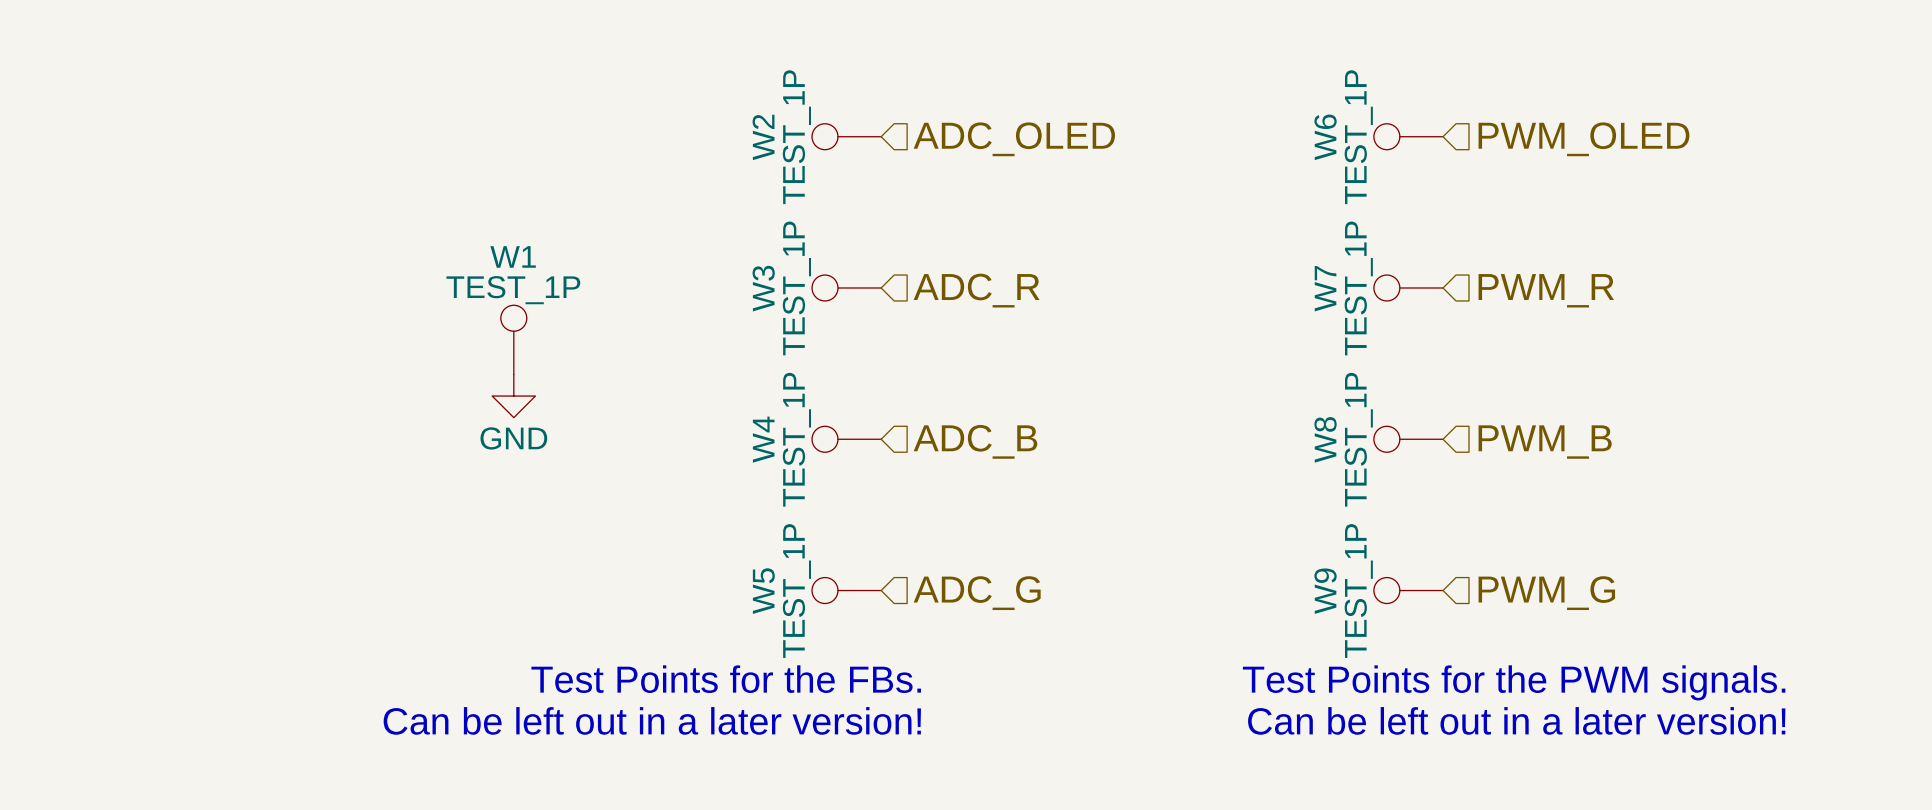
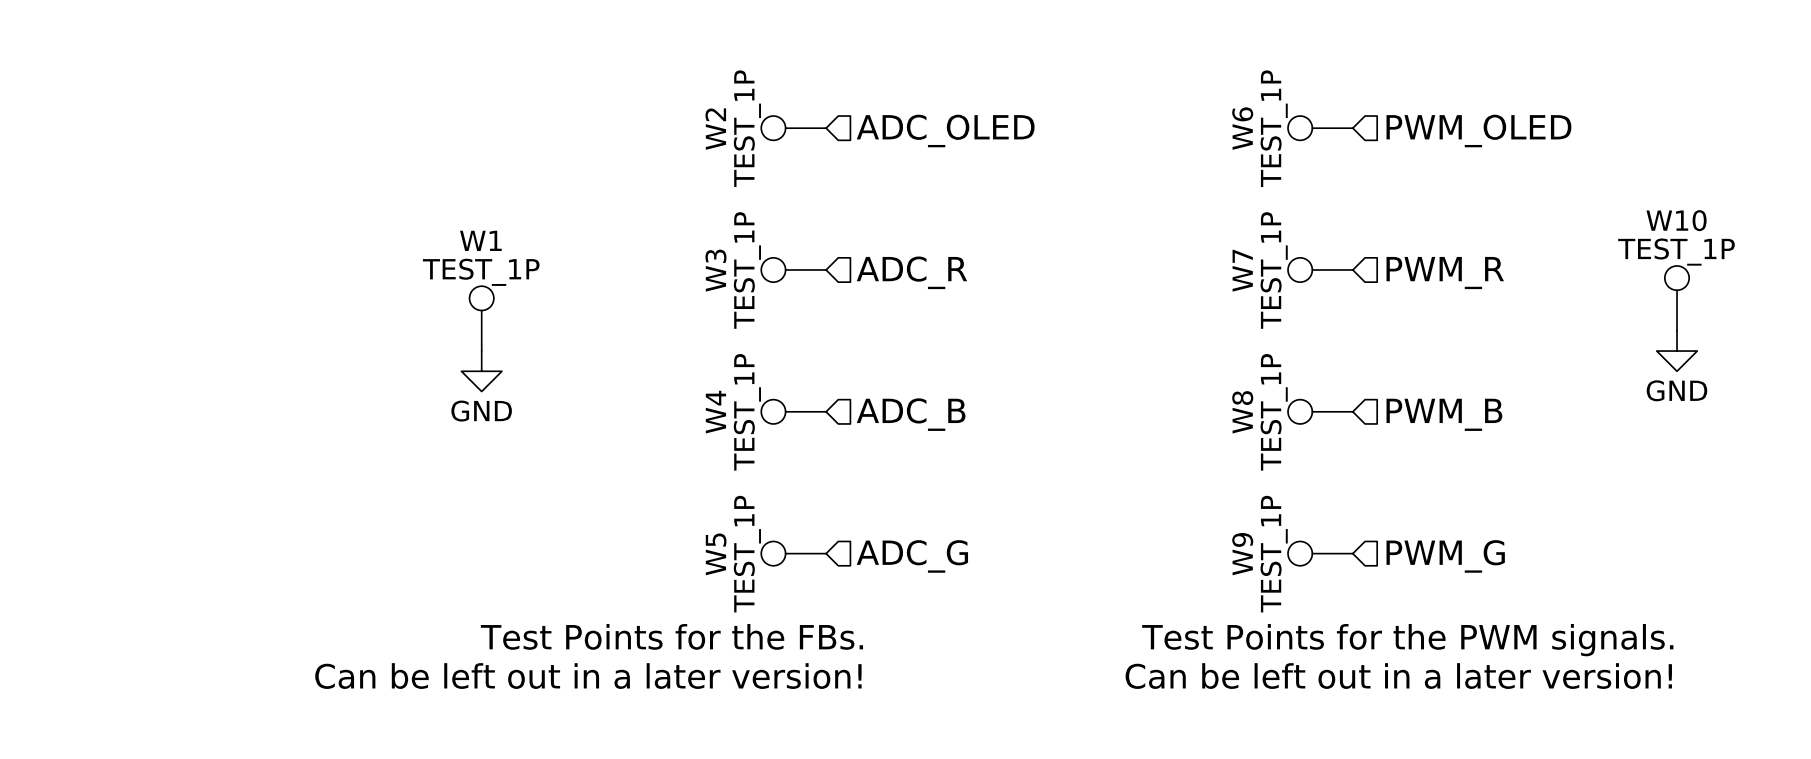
W10: none -> TEST_1P (1677, 298)
power symbol: none -> GND (1677, 351)

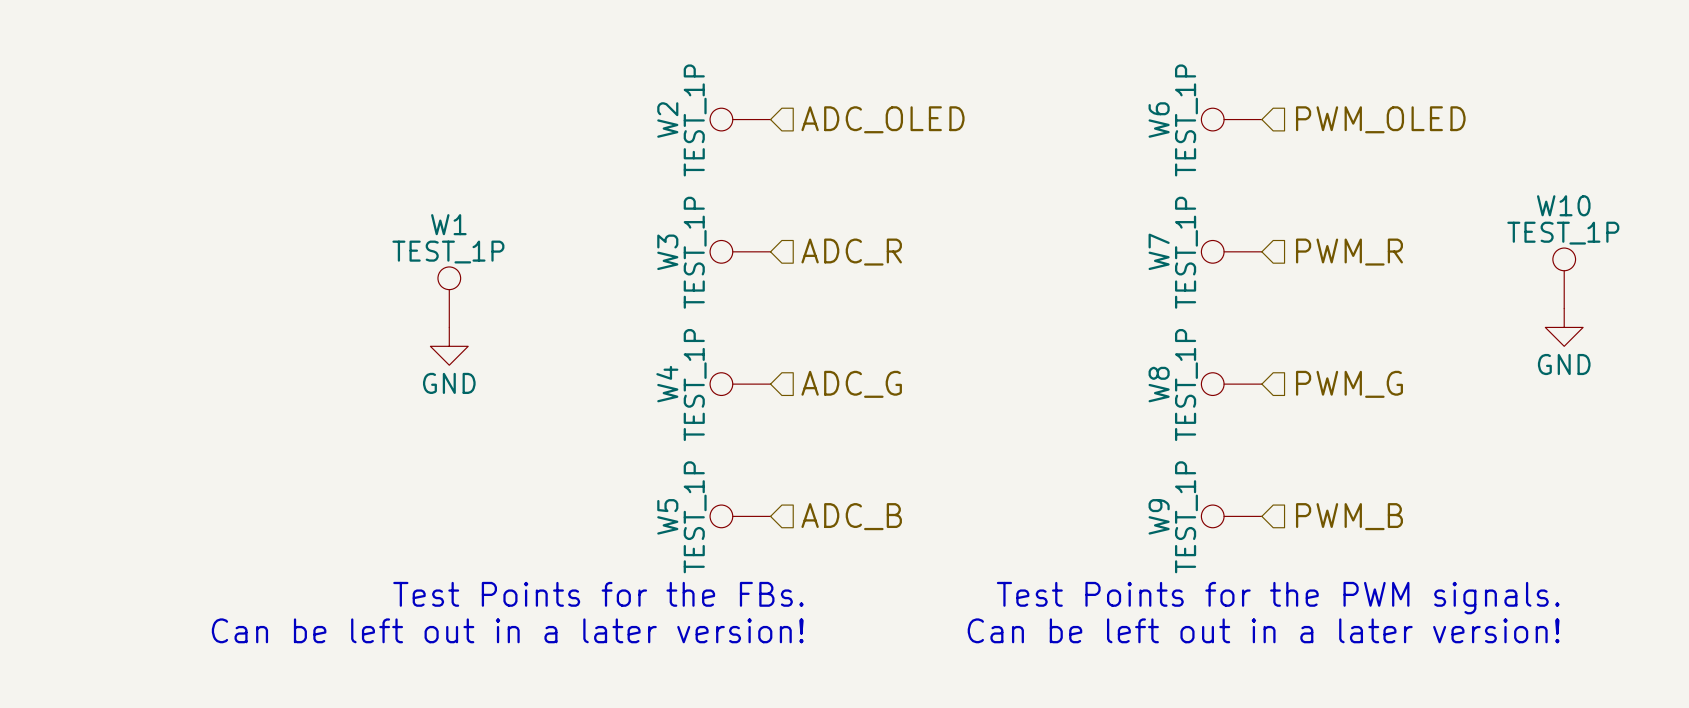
hierarchical label: ADC_B (911, 414) -> ADC_G (851, 384)
hierarchical label: PWM_B (1444, 414) -> PWM_G (1349, 384)
hierarchical label: ADC_G (912, 556) -> ADC_B (851, 516)
hierarchical label: PWM_G (1445, 556) -> PWM_B (1349, 516)

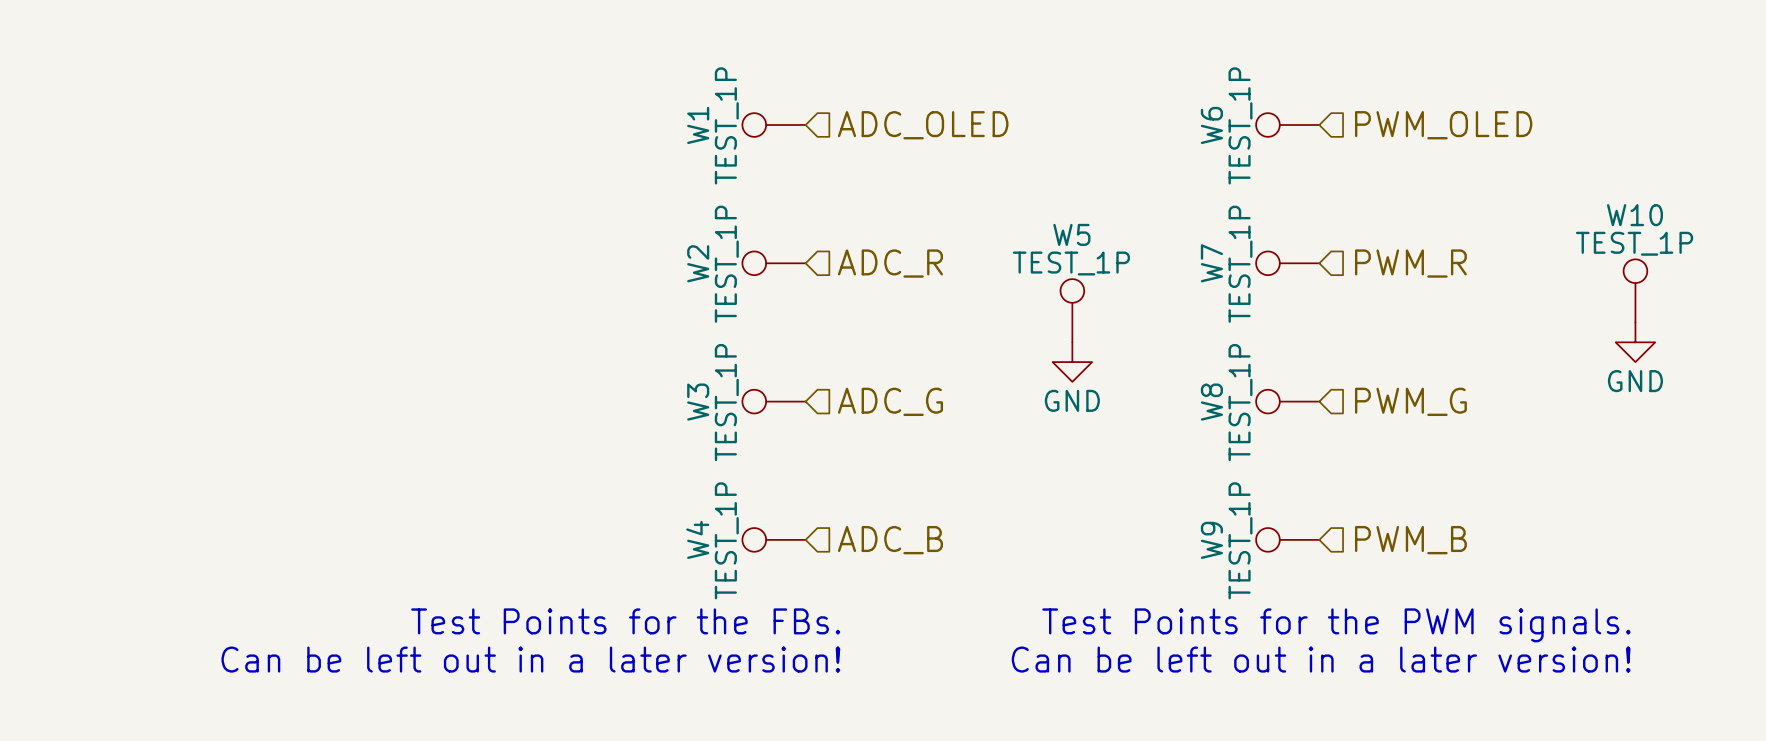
W2 name: W2 (667, 120) -> W1 (698, 125)
W3 name: W3 (667, 252) -> W2 (698, 263)
W1: TEST_1P (449, 297) -> none
W5: none -> TEST_1P (1072, 310)
power symbol: GND (449, 346) -> none
power symbol: none -> GND (1072, 362)
W4 name: W4 (667, 384) -> W3 (698, 402)
W5 name: W5 (667, 516) -> W4 (697, 539)

